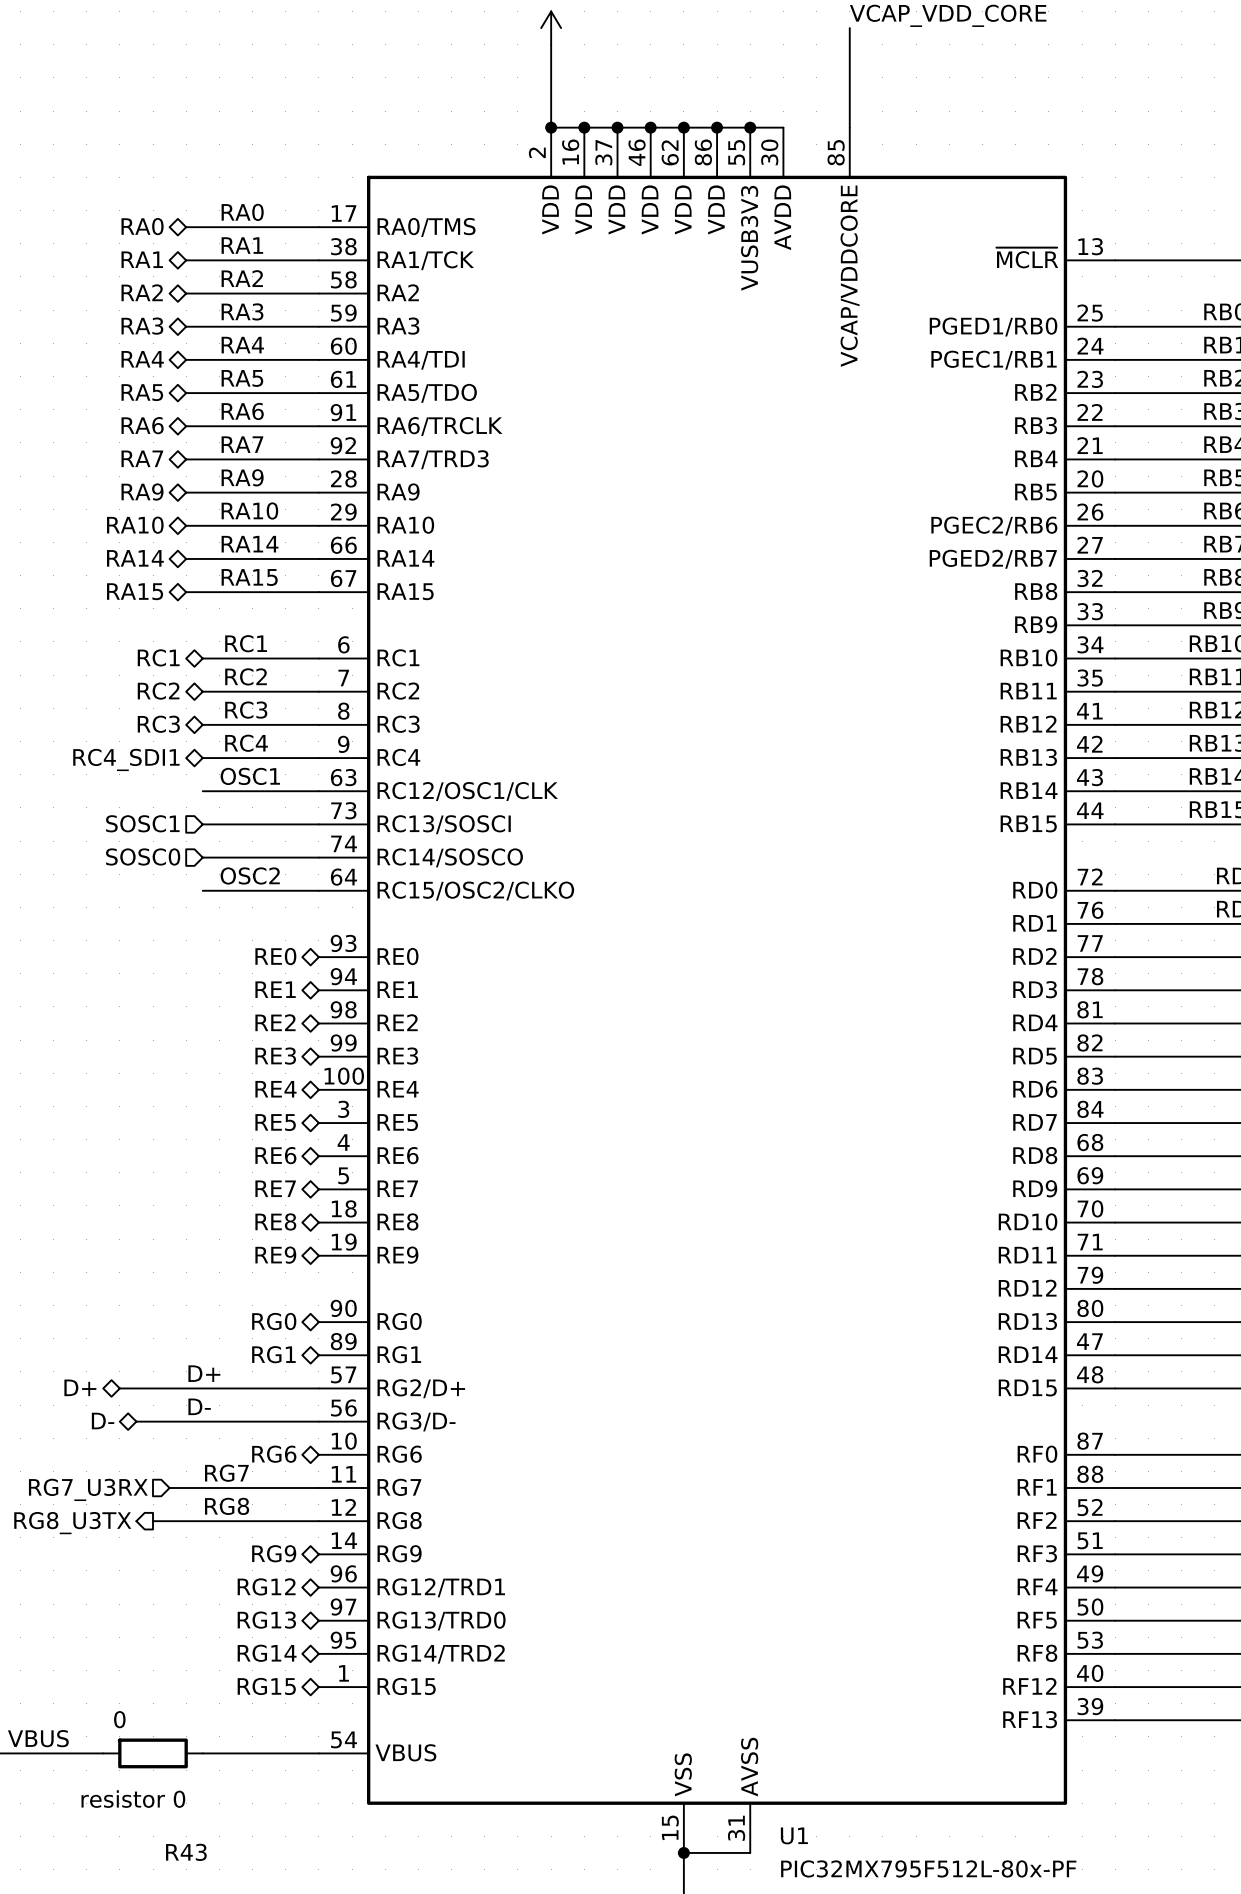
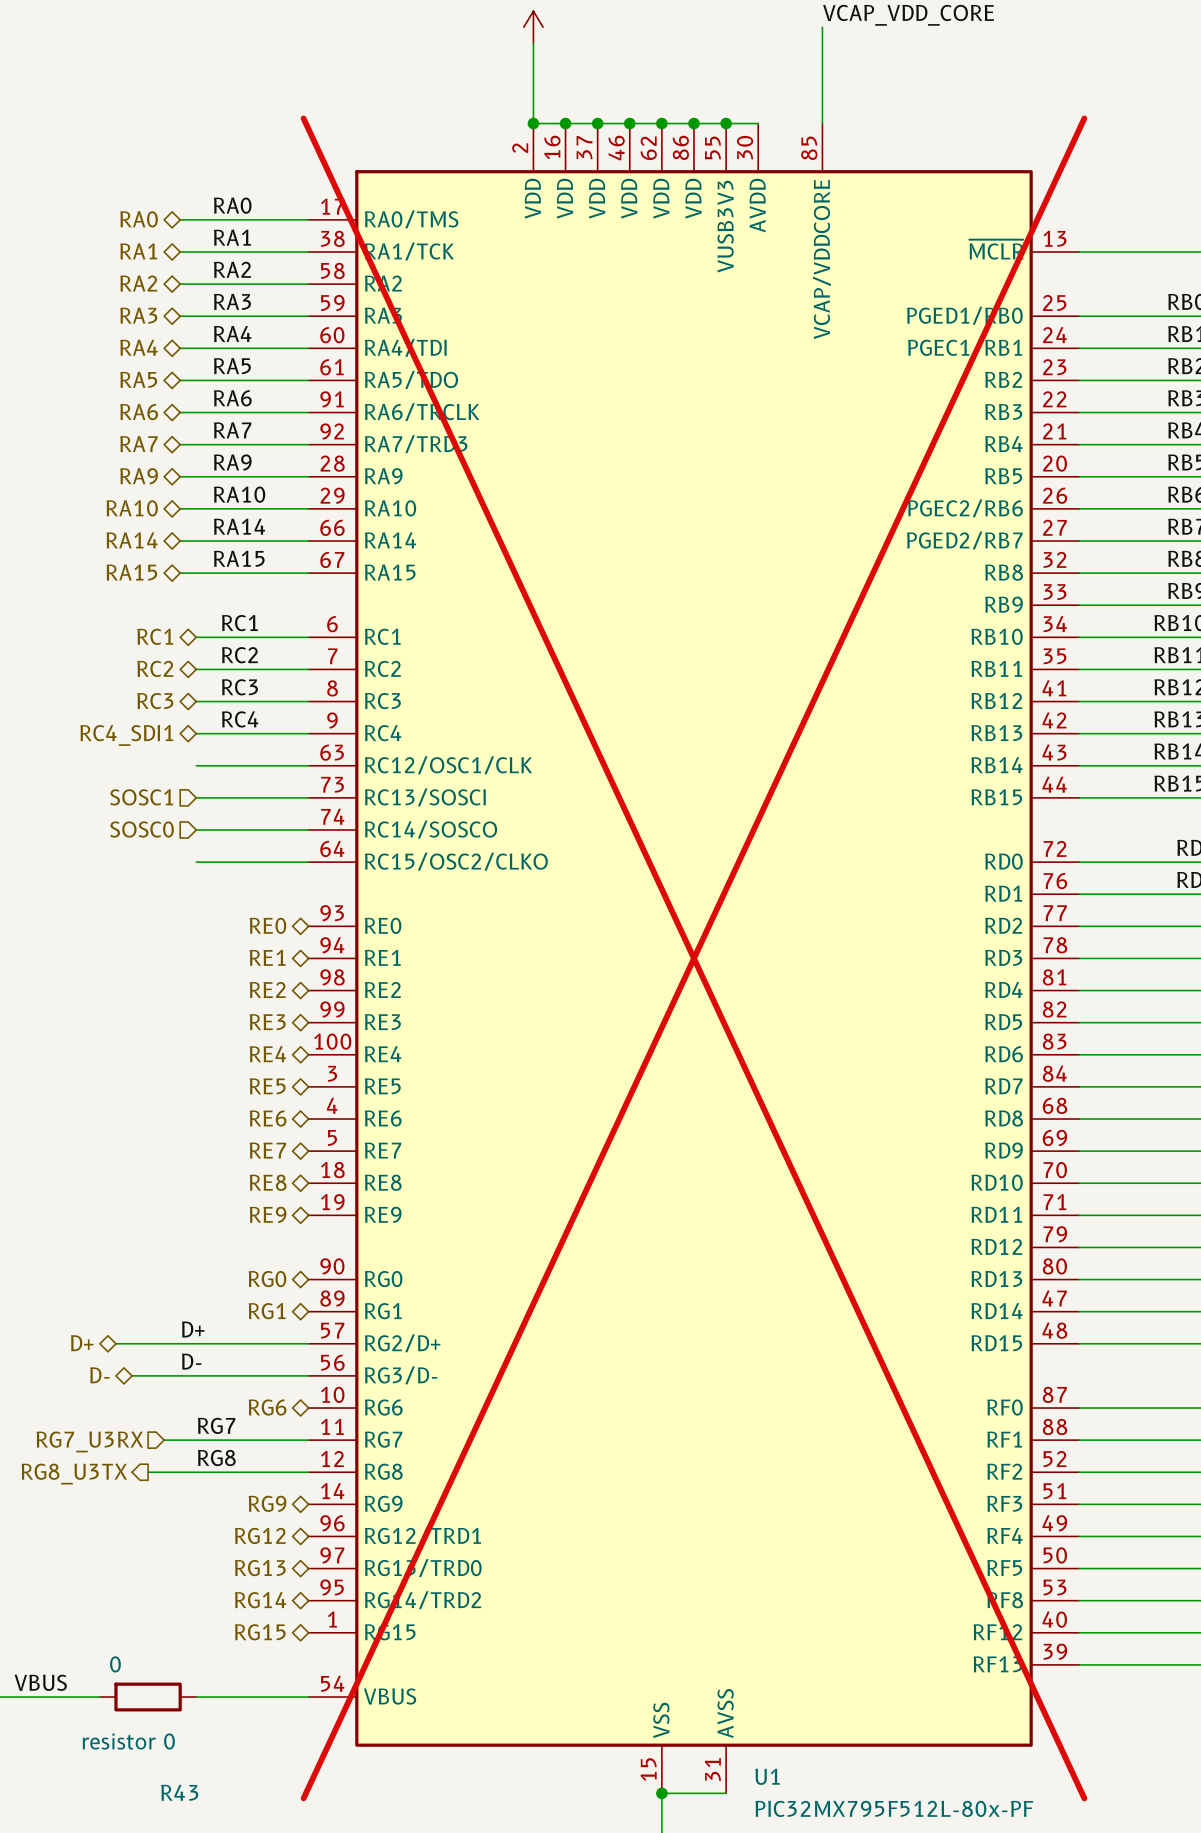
label: OSC1 (250, 776) -> none
label: OSC2 (250, 875) -> none
U1 do-not-place cross: none -> (693, 958)

